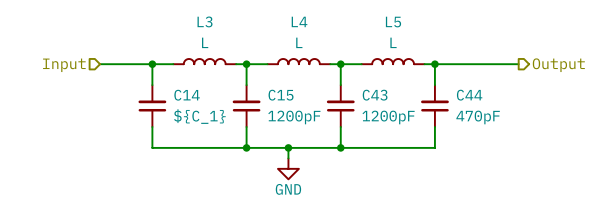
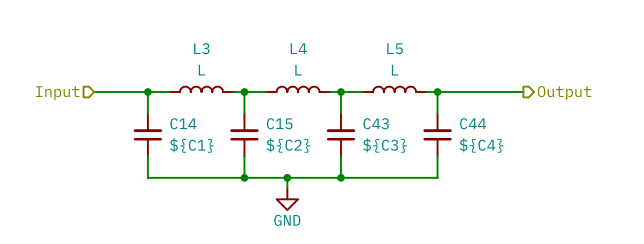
C14 value: ${C_1} (199, 116) -> ${C1} (191, 145)
C15 value: 1200pF (294, 117) -> ${C2} (288, 145)
C43 value: 1200pF (388, 117) -> ${C3} (385, 145)
C44 value: 470pF (478, 117) -> ${C4} (481, 145)

